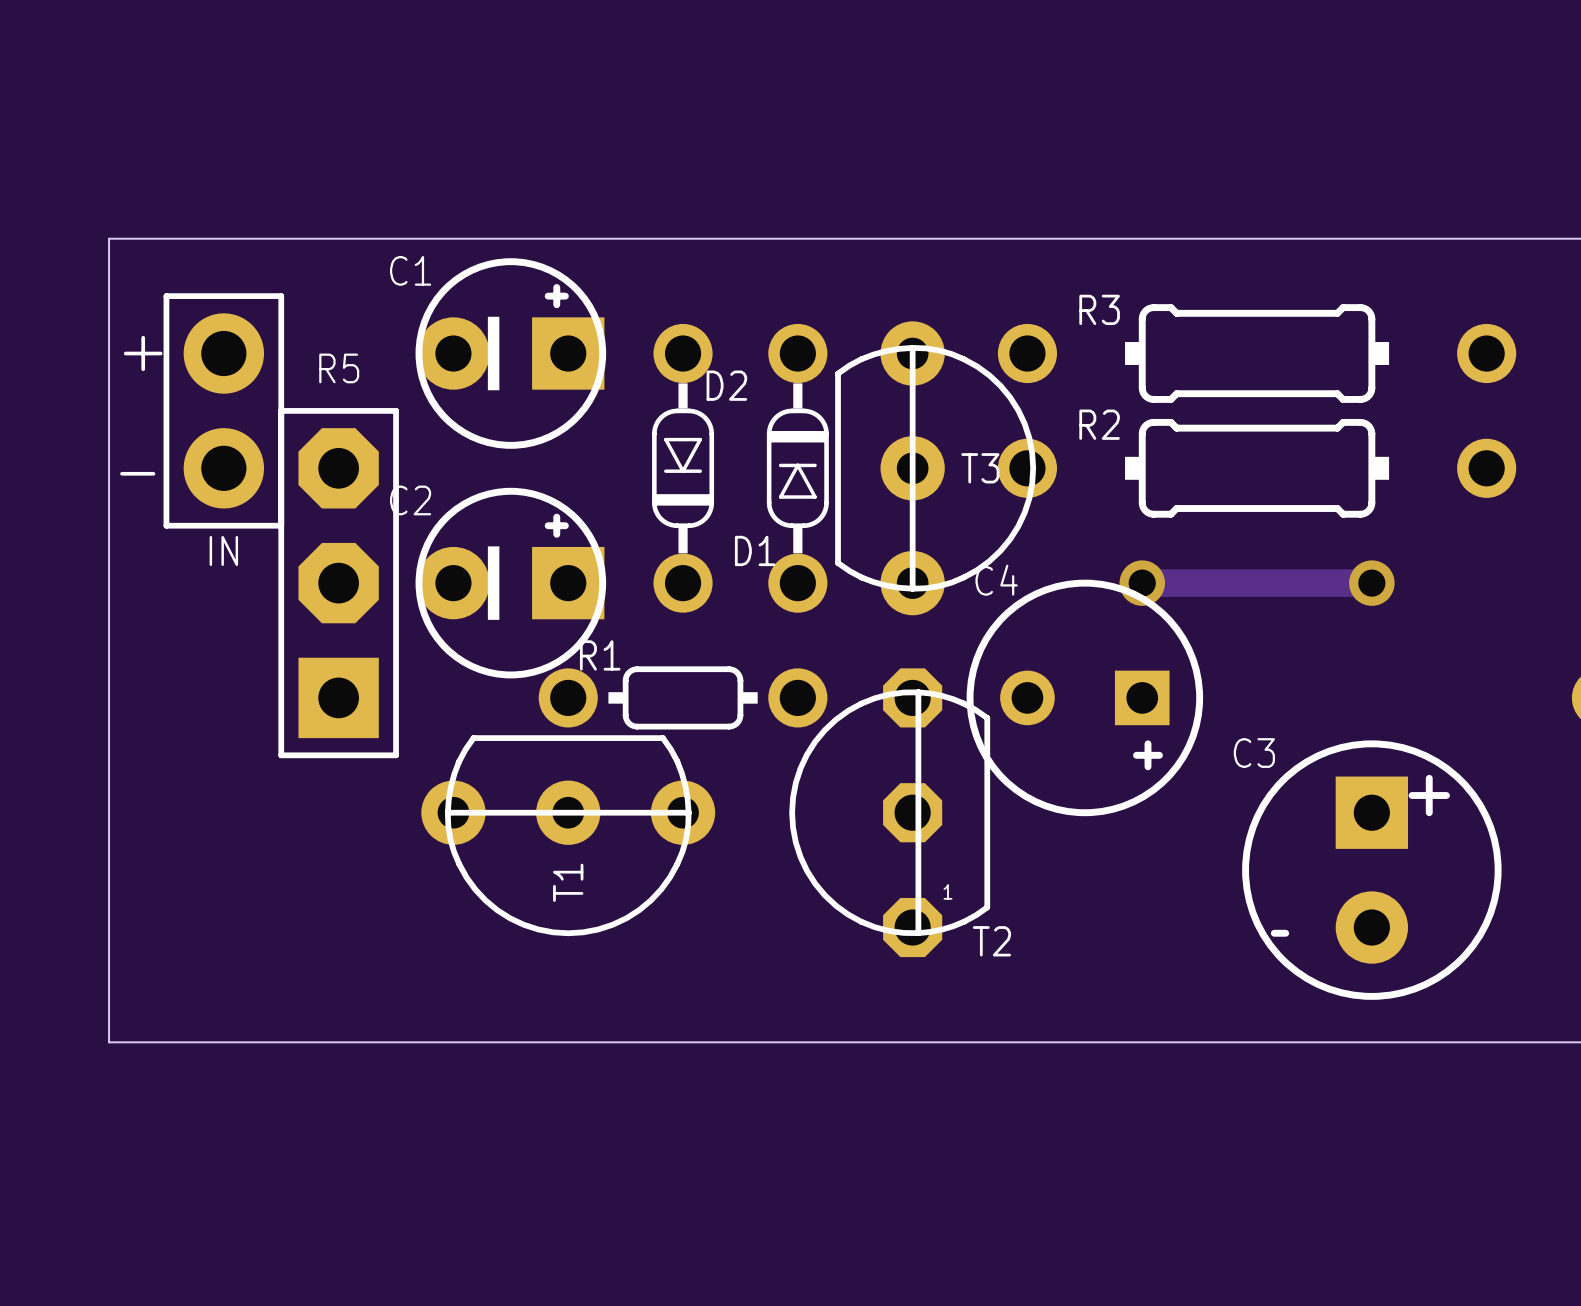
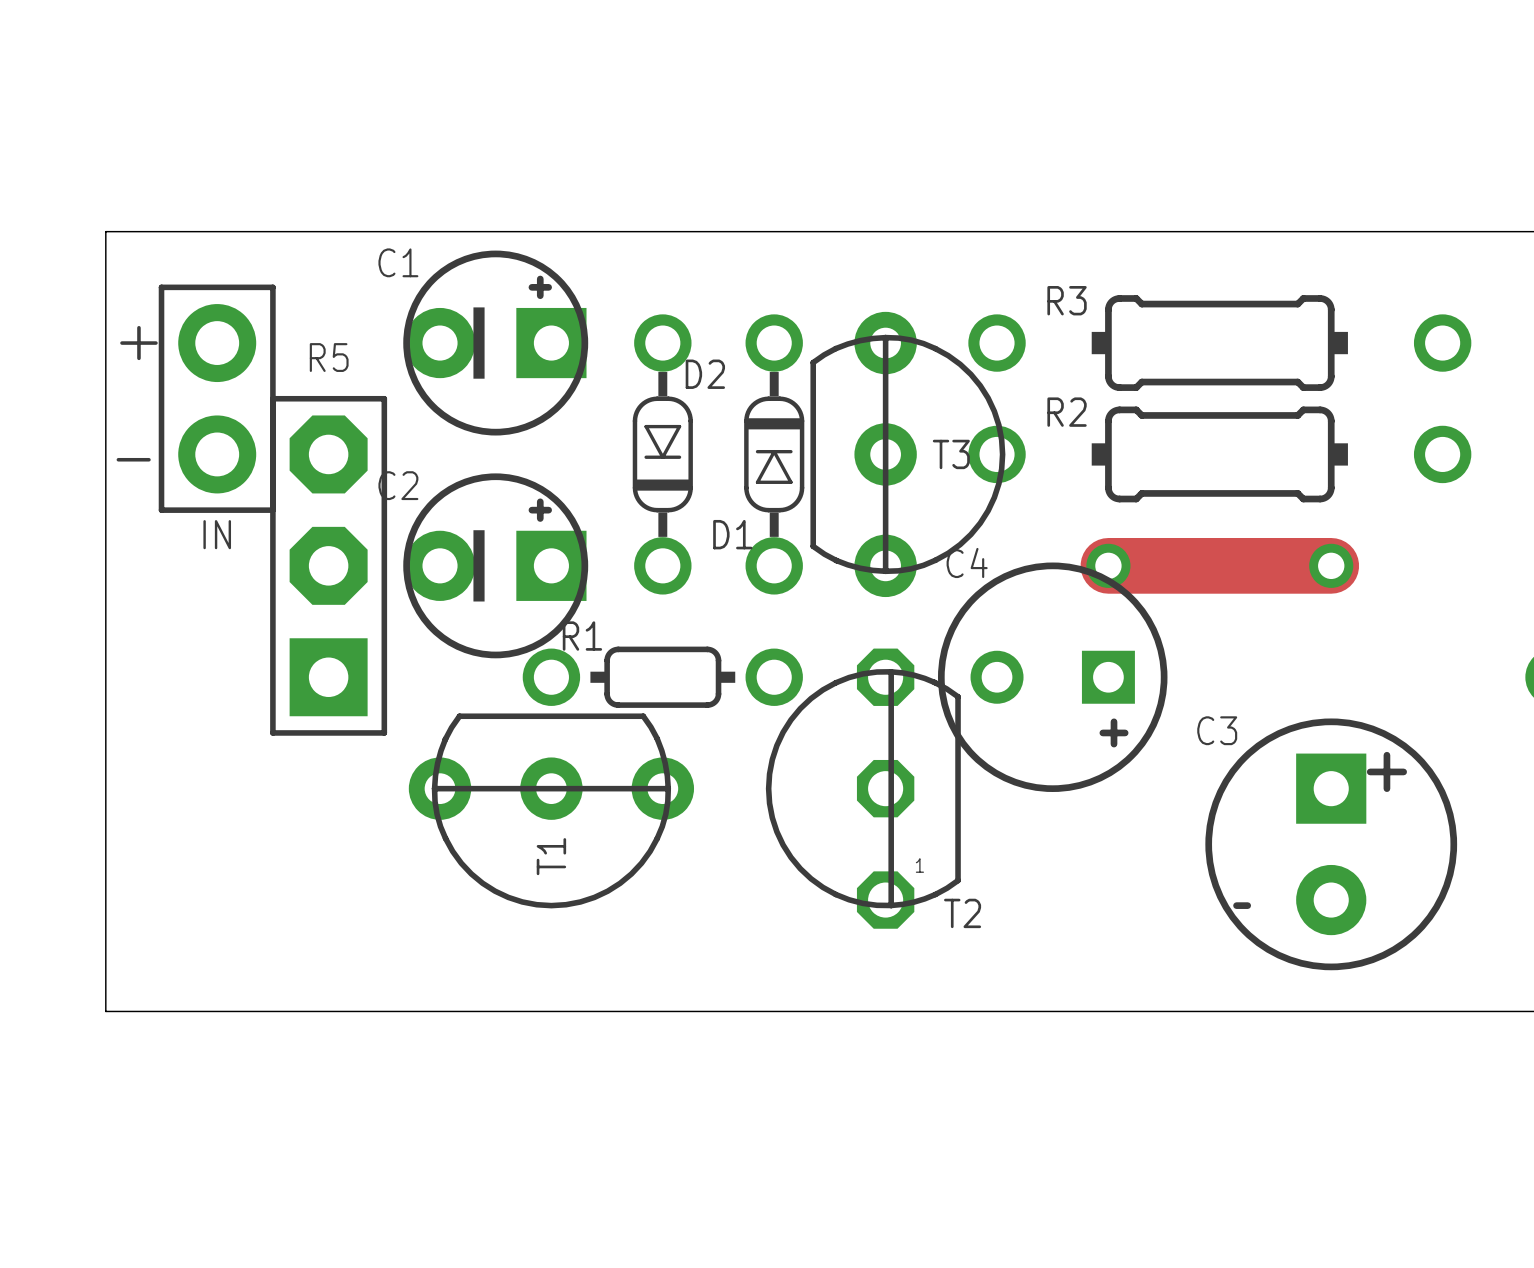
track width: thin (1142, 583) (1371, 583) -> thick (1108, 565) (1331, 565)

